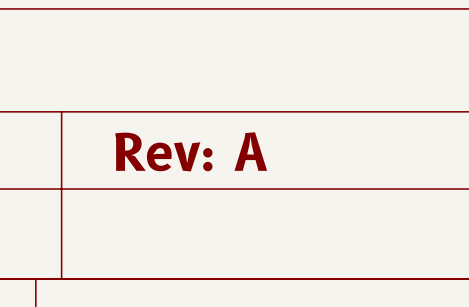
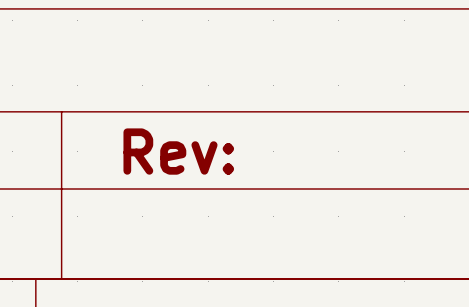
title block: Rev: A (191, 151) -> Rev: (178, 151)

